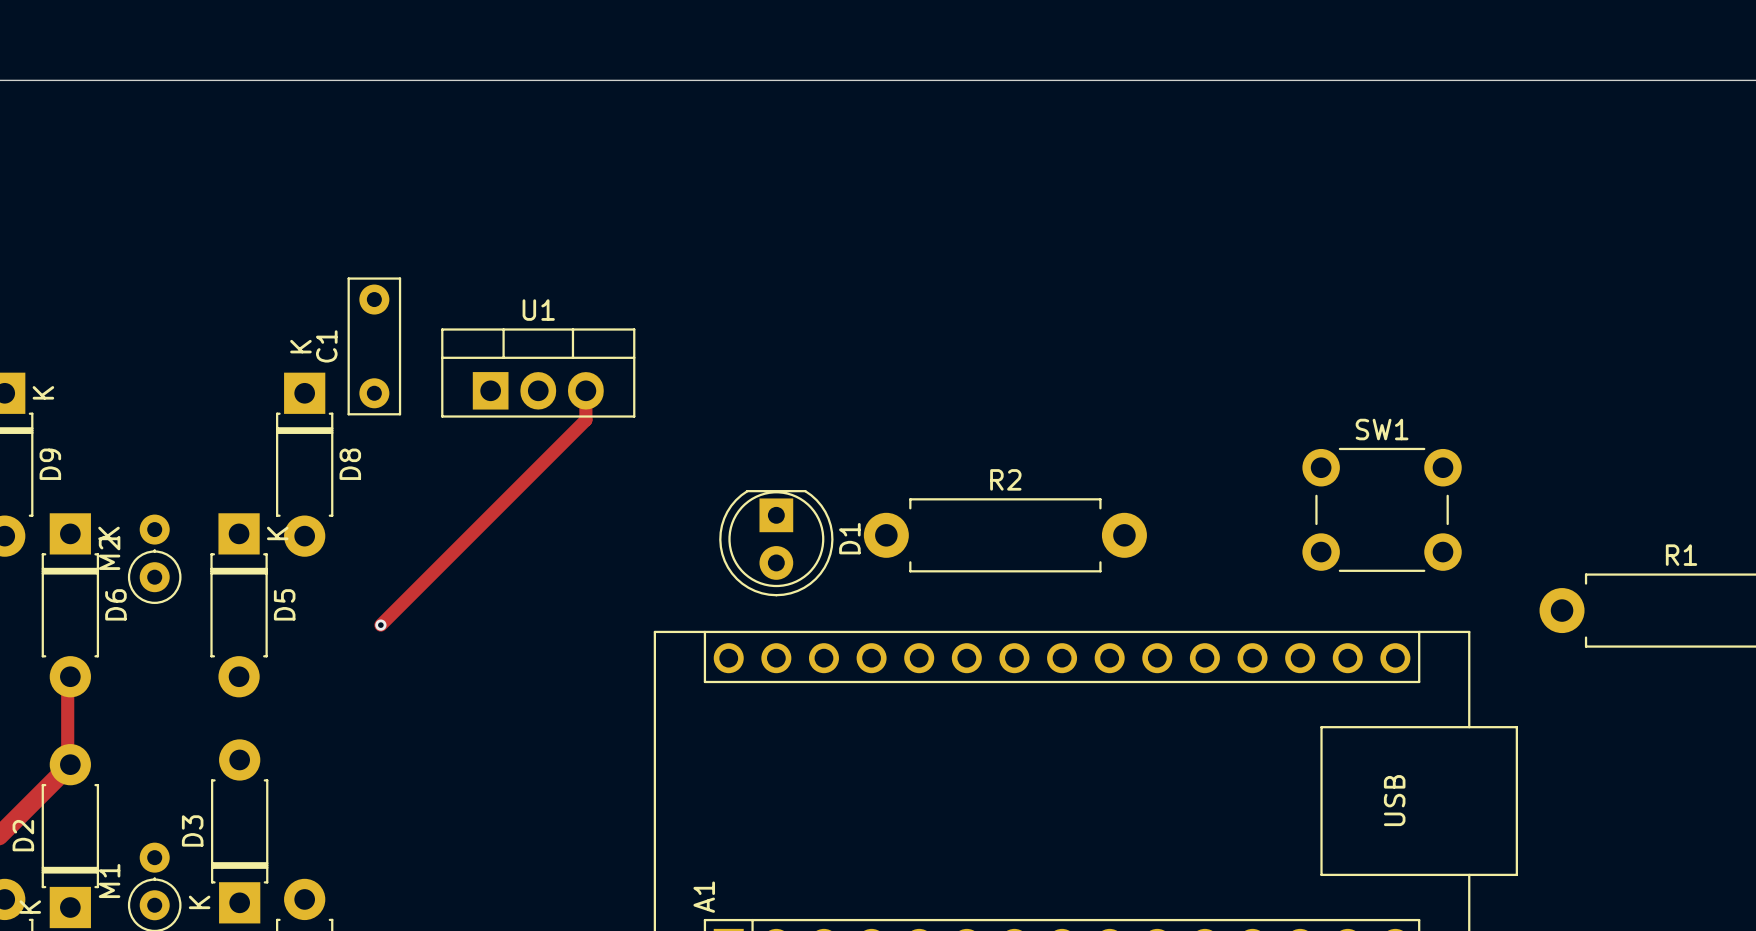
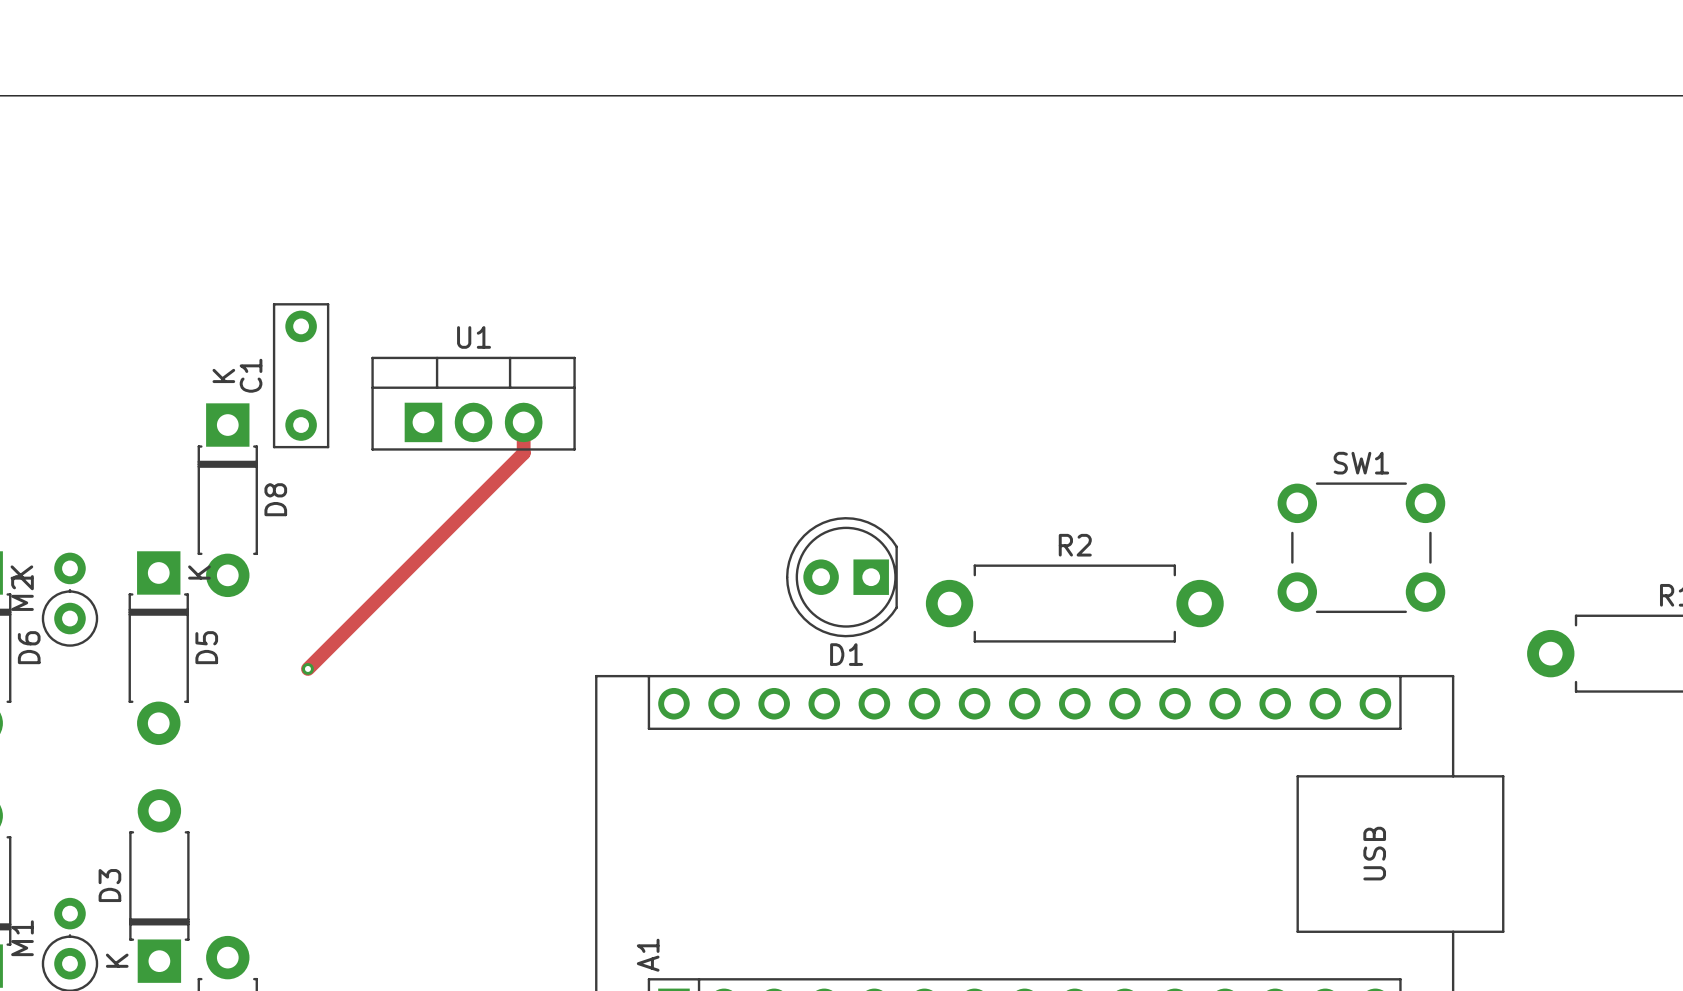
R2 position: (1005, 535) -> (1074, 603)
D1 rotation: 0° (776, 543) -> 90° clockwise (841, 577)
D1 position: (776, 543) -> (841, 577)

